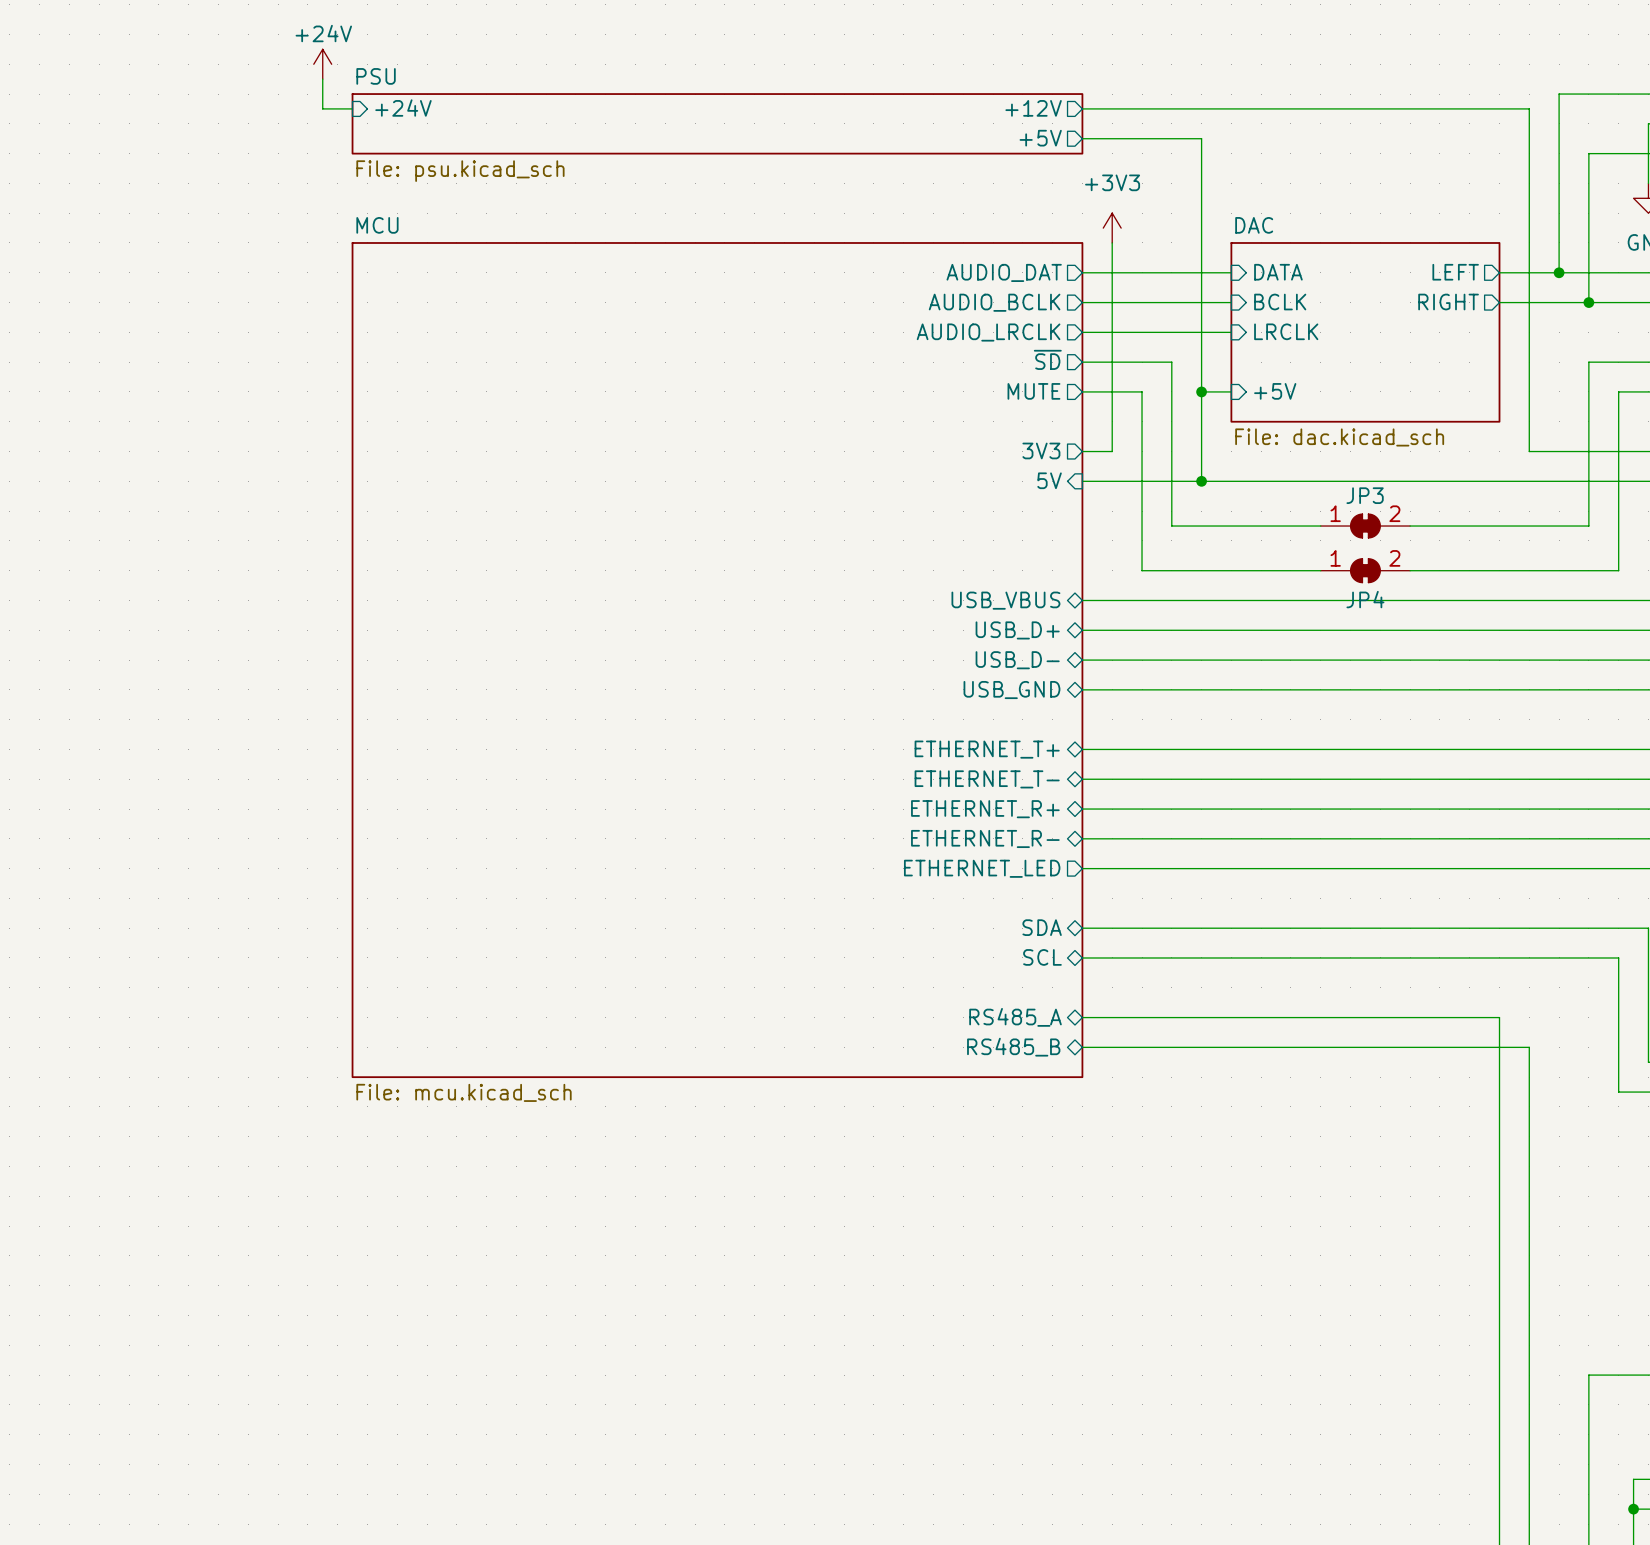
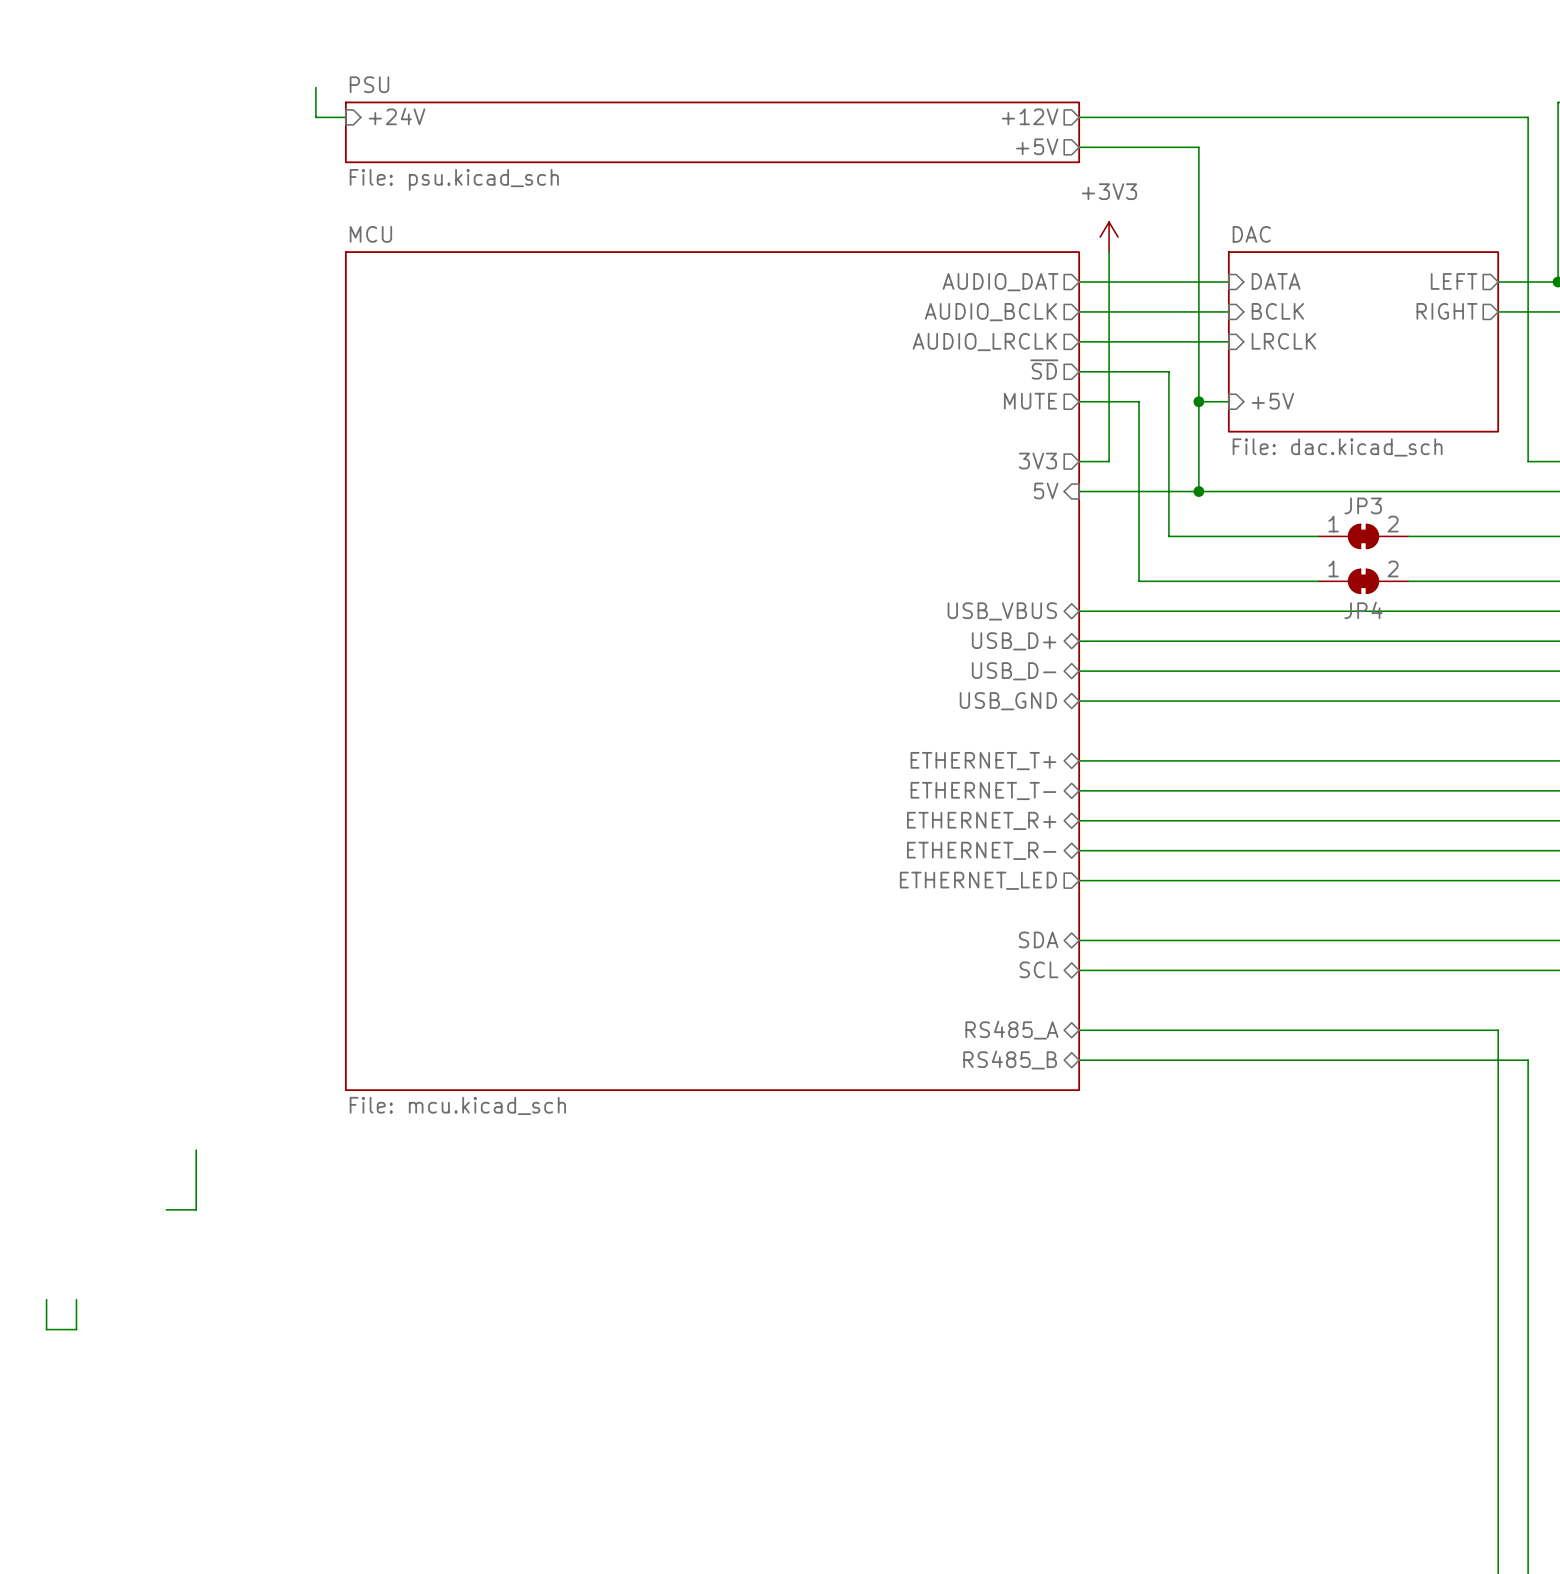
power symbol: +24V (322, 64) -> none
wire: none -> (196, 1150) (196, 1209) (166, 1209)
wire: none -> (46, 1299) (46, 1329) (76, 1329) (76, 1299)

